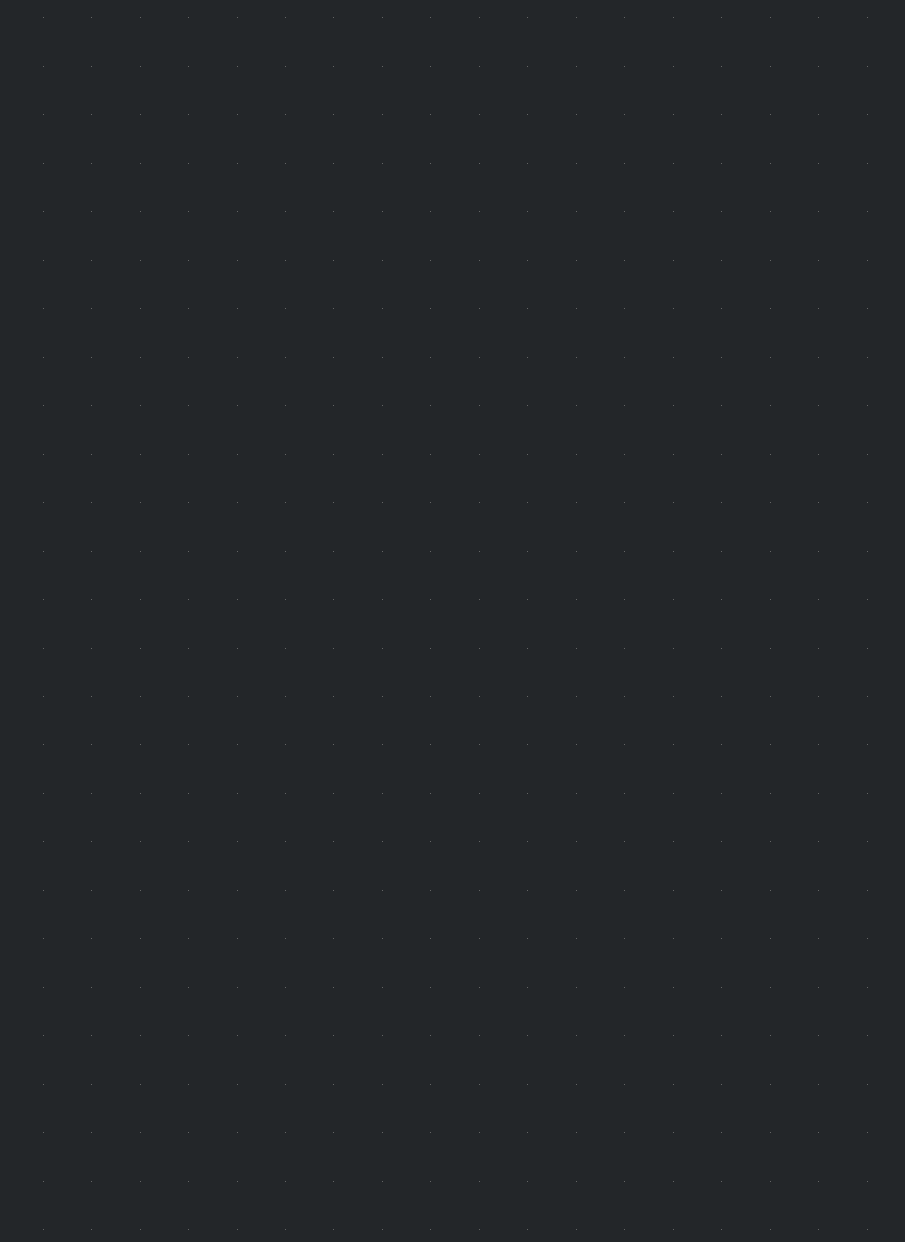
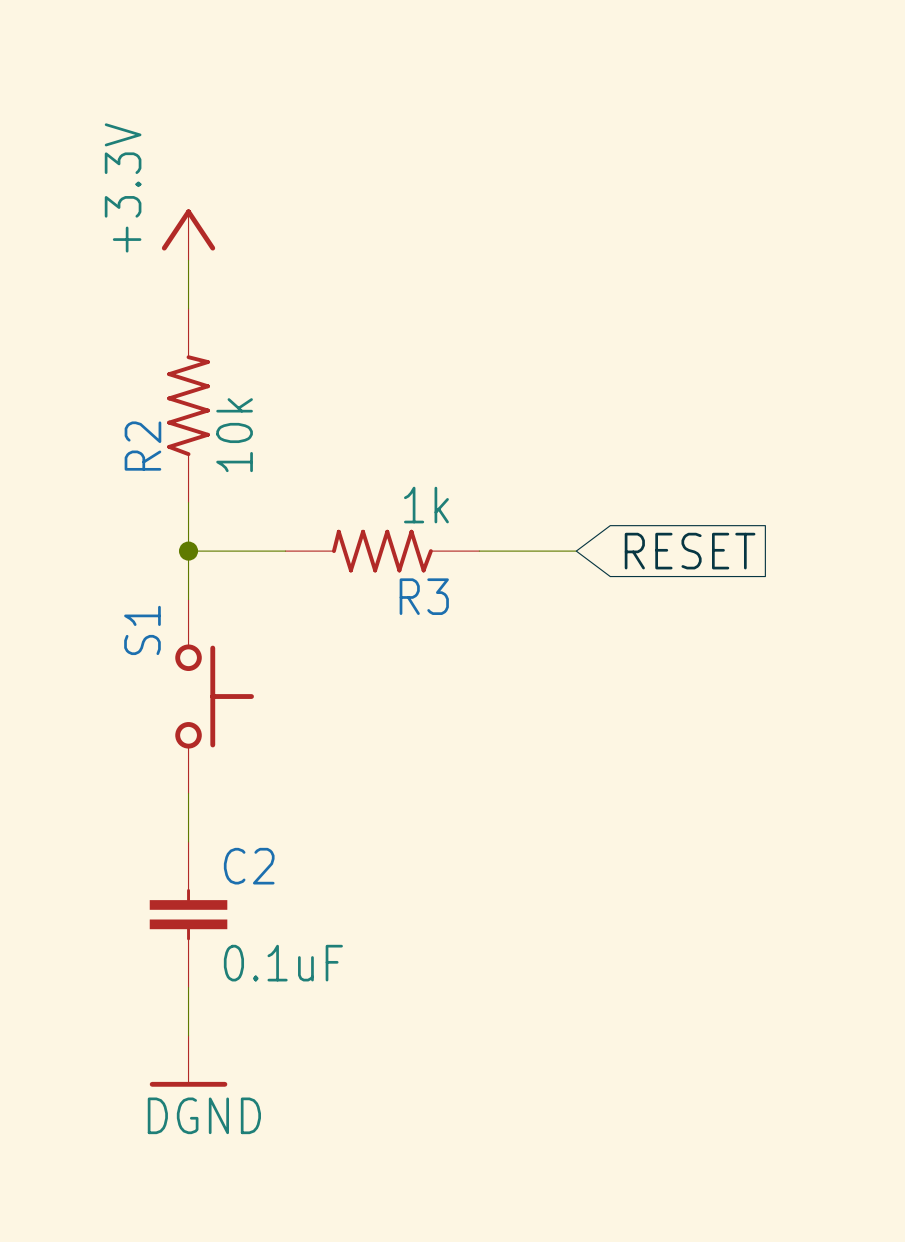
power symbol: none -> +3.3V (188, 234)
wire: none -> (188, 260) (188, 308)
R2: none -> 10k (188, 405)
wire: none -> (188, 502) (188, 599)
wire: none -> (188, 551) (285, 551)
junction: none -> (188, 551)
R3: none -> 1k (382, 551)
wire: none -> (479, 551) (576, 551)
global label: none -> RESET (690, 551)
S1: none -> (214, 696)
wire: none -> (188, 793) (188, 841)
C2: none -> 0.1uF (188, 914)
wire: none -> (188, 987) (188, 1035)
power symbol: none -> DGND (188, 1061)

